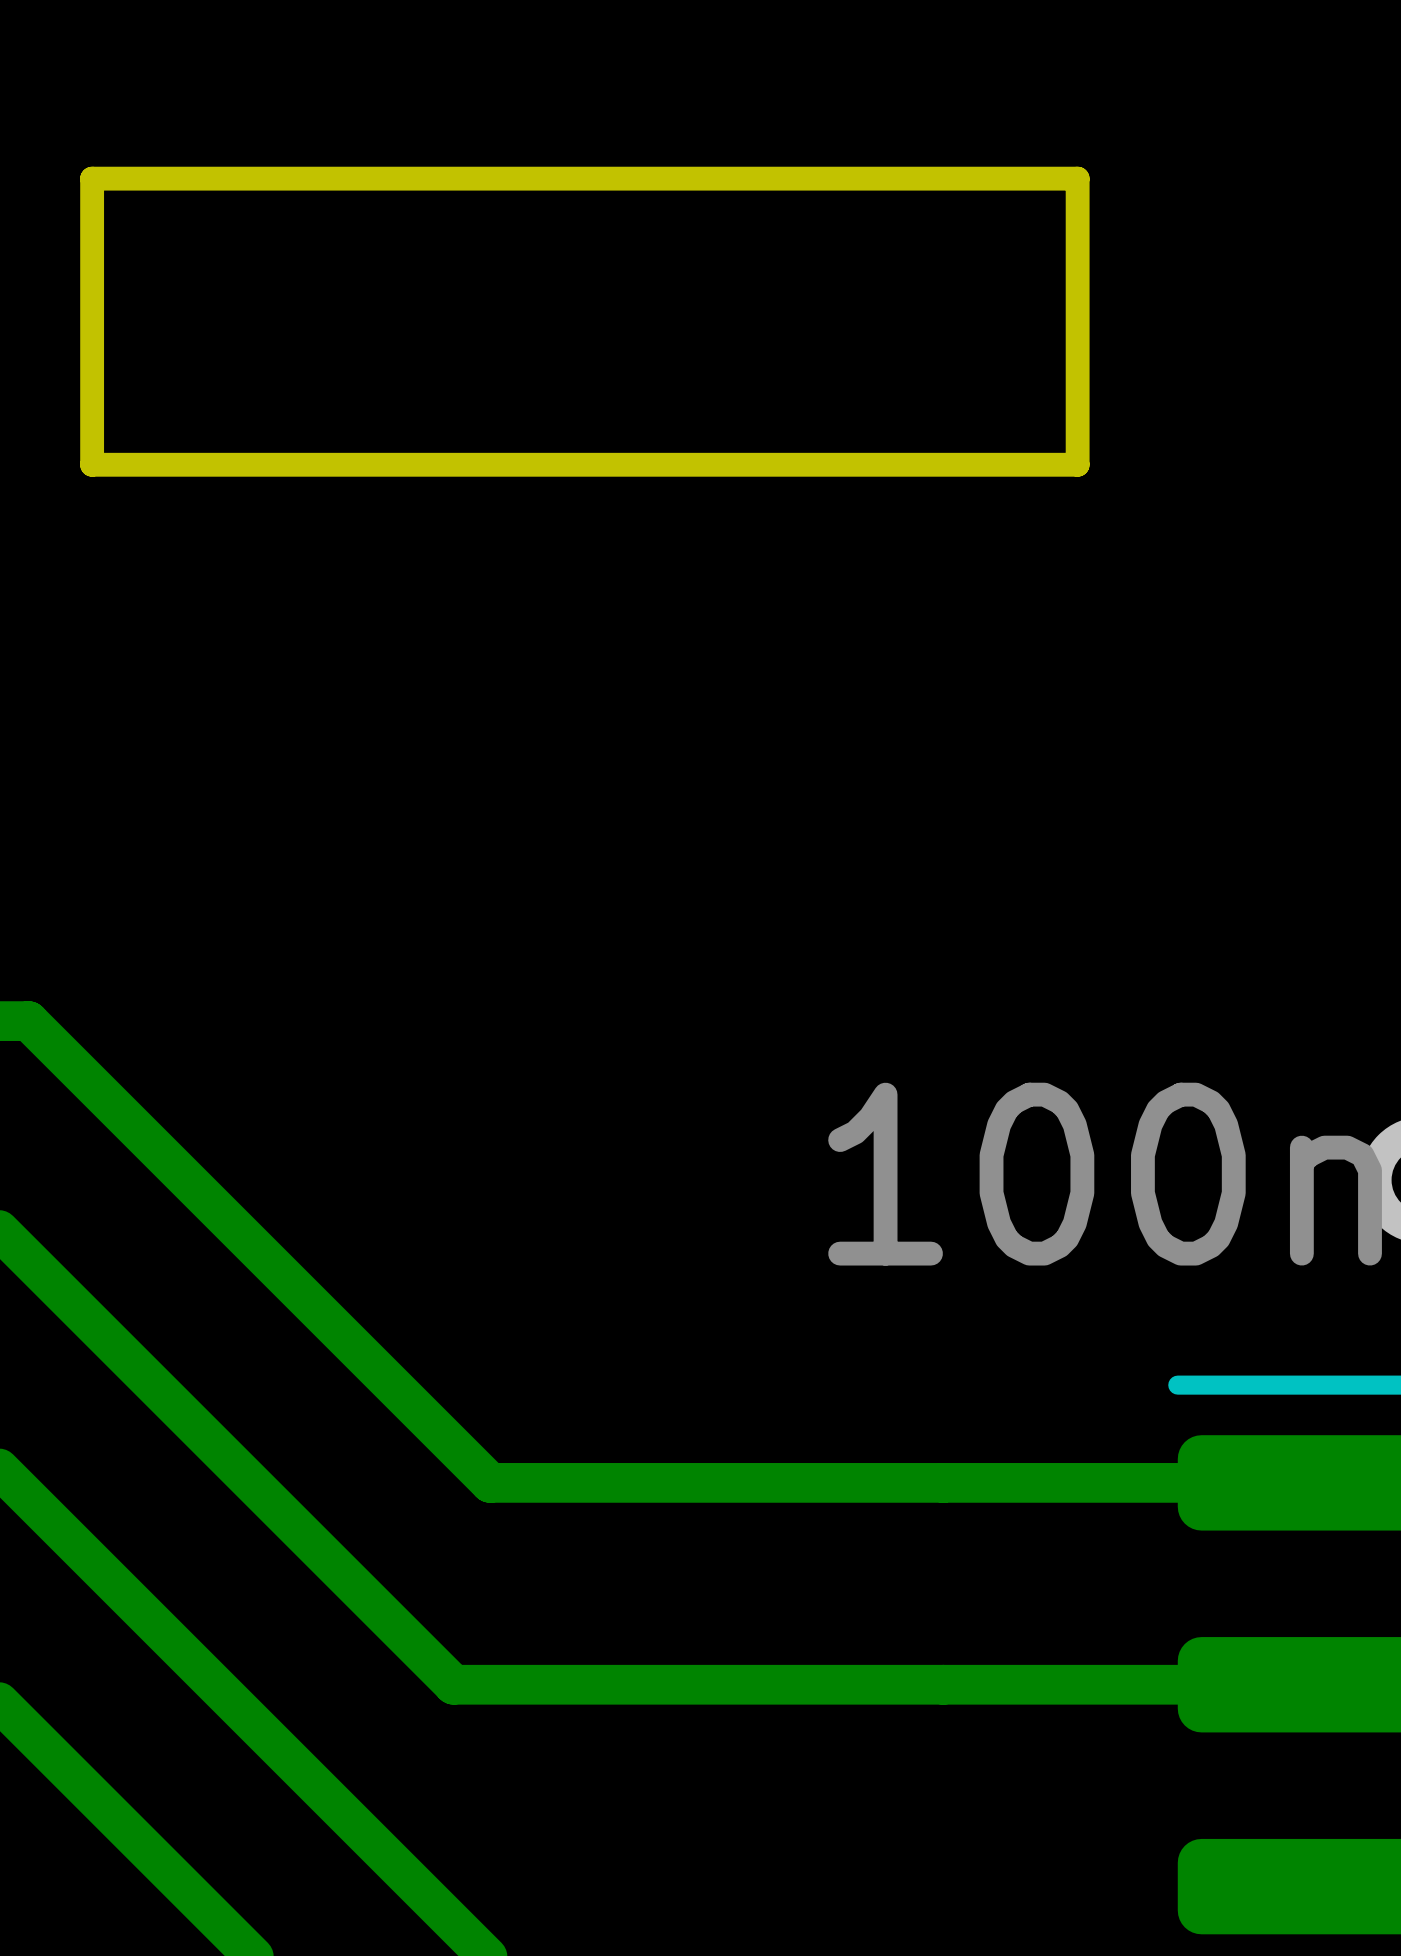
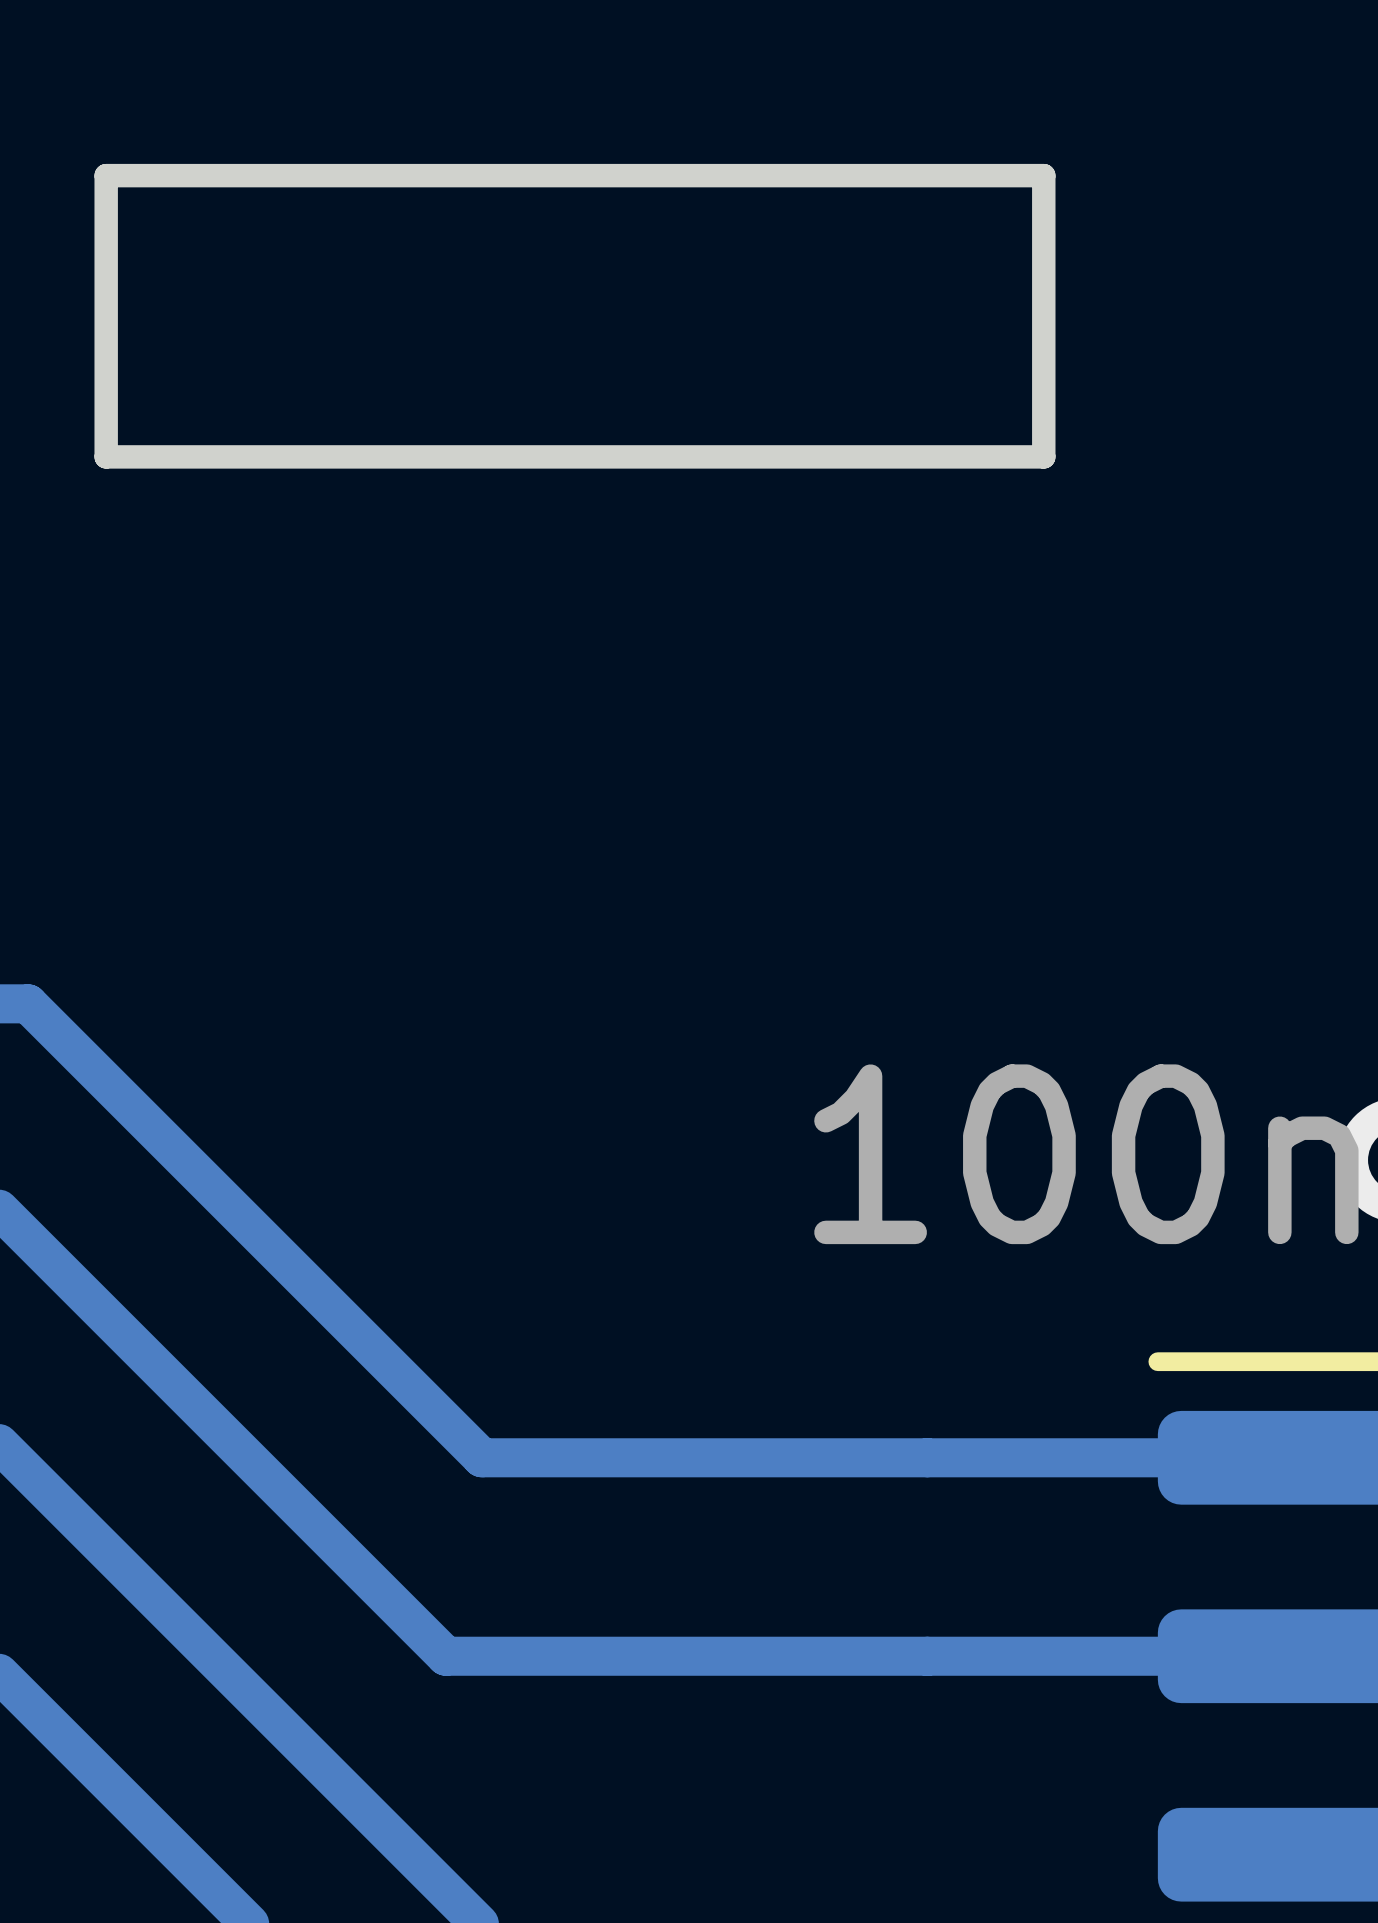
board edge: (108, 178) (92, 178) (92, 464) (108, 464) -> (106, 175) (106, 456)
board edge: (1061, 178) (1077, 178) (1077, 464) (1061, 464) -> (1043, 175) (1043, 456)

